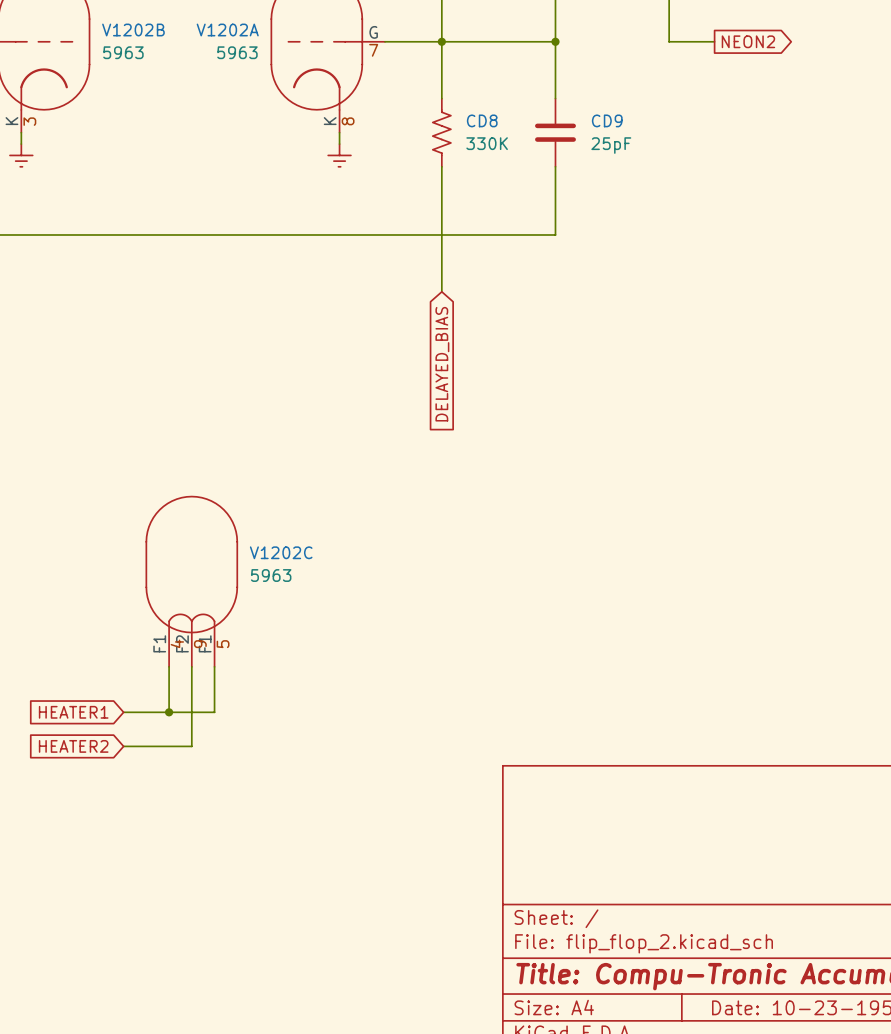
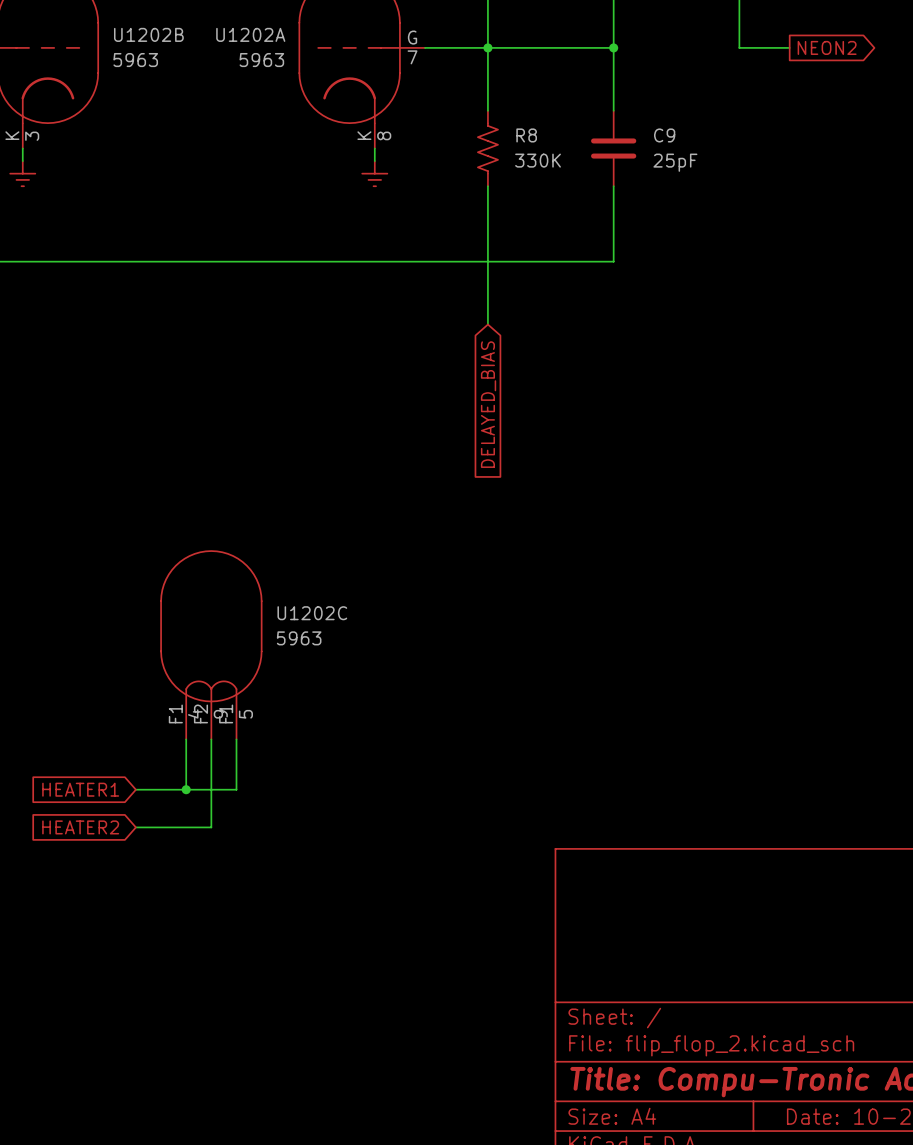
V1202B name: V1202B (133, 30) -> U1202B (148, 34)
V1202A name: V1202A (227, 30) -> U1202A (250, 34)
CD8 name: CD8 (482, 120) -> R8 (526, 135)
CD9 name: CD9 (607, 120) -> C9 (664, 135)
V1202C name: V1202C (281, 552) -> U1202C (312, 613)

